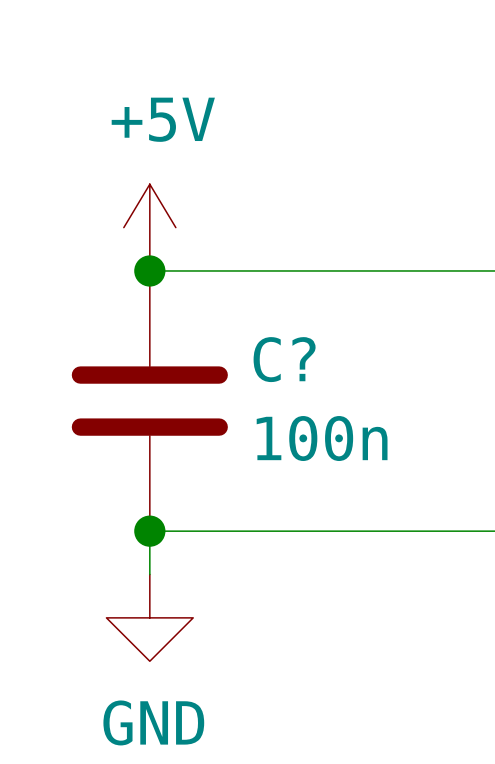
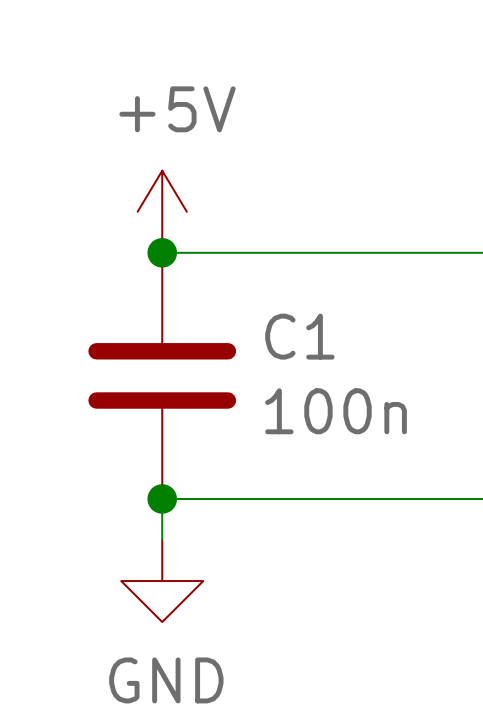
C? name: C? (284, 359) -> C1 (299, 336)

